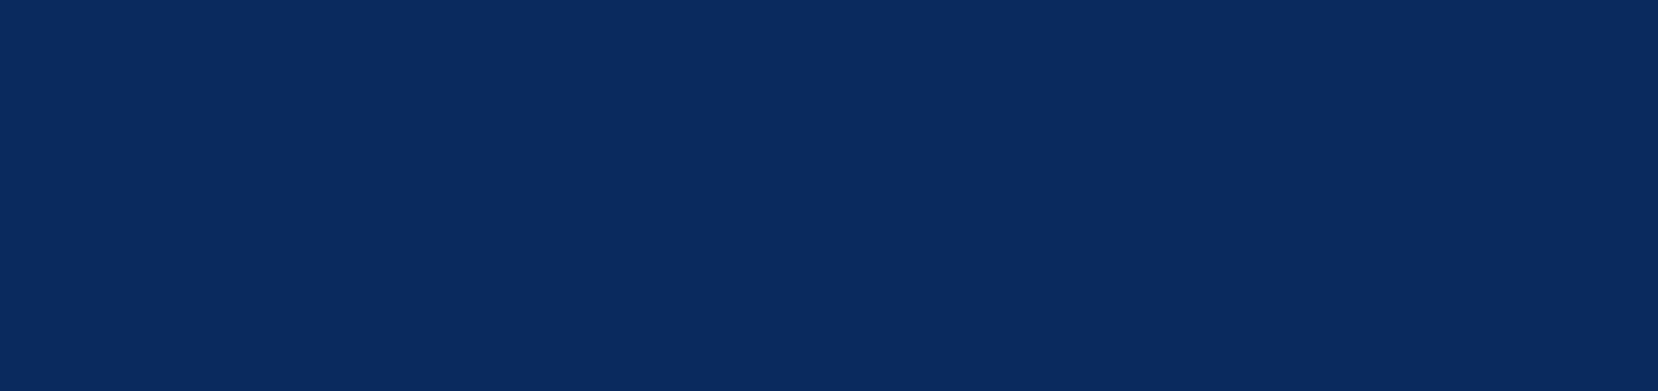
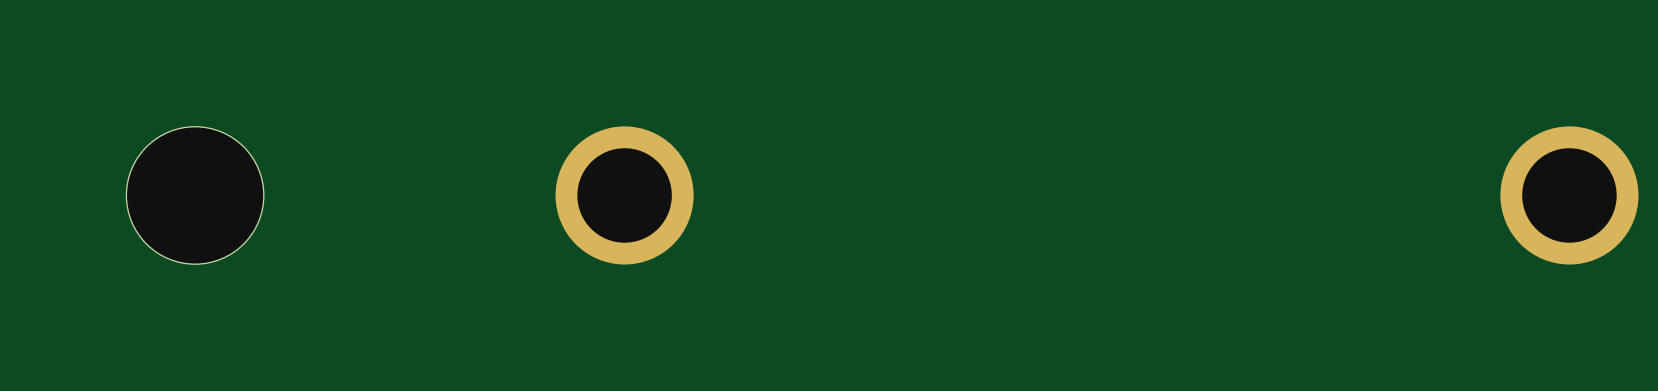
hole: none -> (195, 195)
part: none -> (624, 195)
part: none -> (1569, 195)

